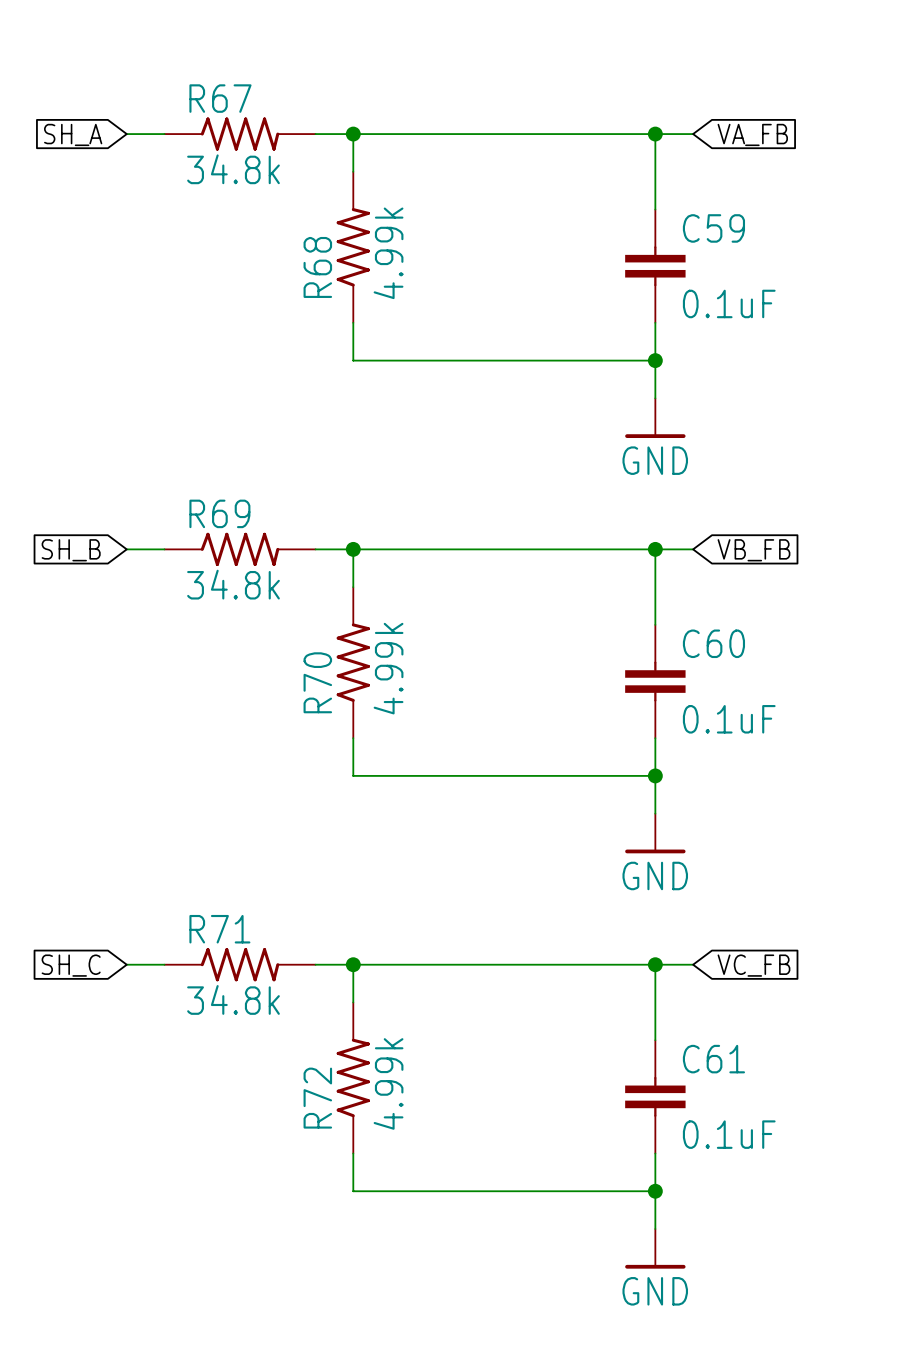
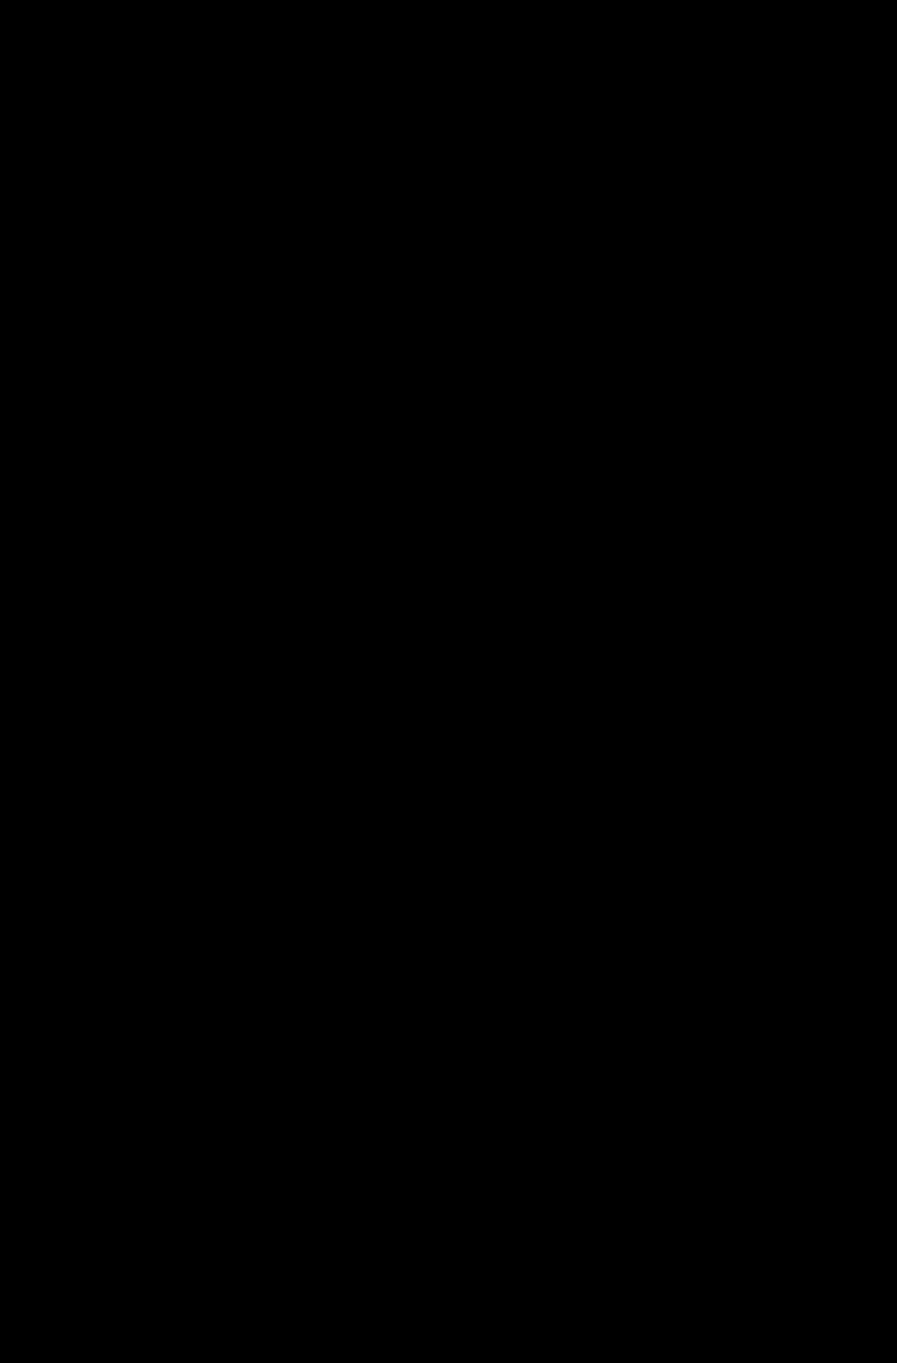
global label: SH_A (73, 134) -> none
wire: (126, 134) (164, 134) -> none
R67: 34.8k (240, 134) -> none
wire: (315, 134) (693, 134) -> none
wire: (353, 134) (353, 171) -> none
junction: (353, 134) -> none
wire: (655, 134) (655, 209) -> none
junction: (655, 134) -> none
global label: VA_FB (752, 134) -> none
R68: 4.99k (353, 247) -> none
C59: 0.1uF (655, 266) -> none
wire: (353, 322) (353, 360) (655, 360) -> none
wire: (655, 322) (655, 398) -> none
junction: (655, 360) -> none
power symbol: GND (655, 418) -> none
wire: (126, 549) (164, 549) -> none
R69: 34.8k (240, 549) -> none
wire: (315, 549) (693, 549) -> none
wire: (353, 549) (353, 587) -> none
junction: (353, 549) -> none
wire: (655, 549) (655, 624) -> none
junction: (655, 549) -> none
global label: SH_B (71, 550) -> none
global label: VB_FB (753, 550) -> none
R70: 4.99k (353, 662) -> none
C60: 0.1uF (655, 681) -> none
wire: (353, 738) (353, 775) (655, 775) -> none
wire: (655, 738) (655, 813) -> none
junction: (655, 775) -> none
power symbol: GND (655, 833) -> none
wire: (126, 964) (164, 964) -> none
R71: 34.8k (240, 964) -> none
wire: (315, 964) (693, 964) -> none
wire: (353, 964) (353, 1002) -> none
junction: (353, 964) -> none
wire: (655, 964) (655, 1040) -> none
junction: (655, 964) -> none
global label: SH_C (71, 965) -> none
global label: VC_FB (753, 965) -> none
R72: 4.99k (353, 1077) -> none
C61: 0.1uF (655, 1096) -> none
wire: (353, 1153) (353, 1191) (655, 1191) -> none
wire: (655, 1153) (655, 1229) -> none
junction: (655, 1191) -> none
power symbol: GND (655, 1248) -> none

